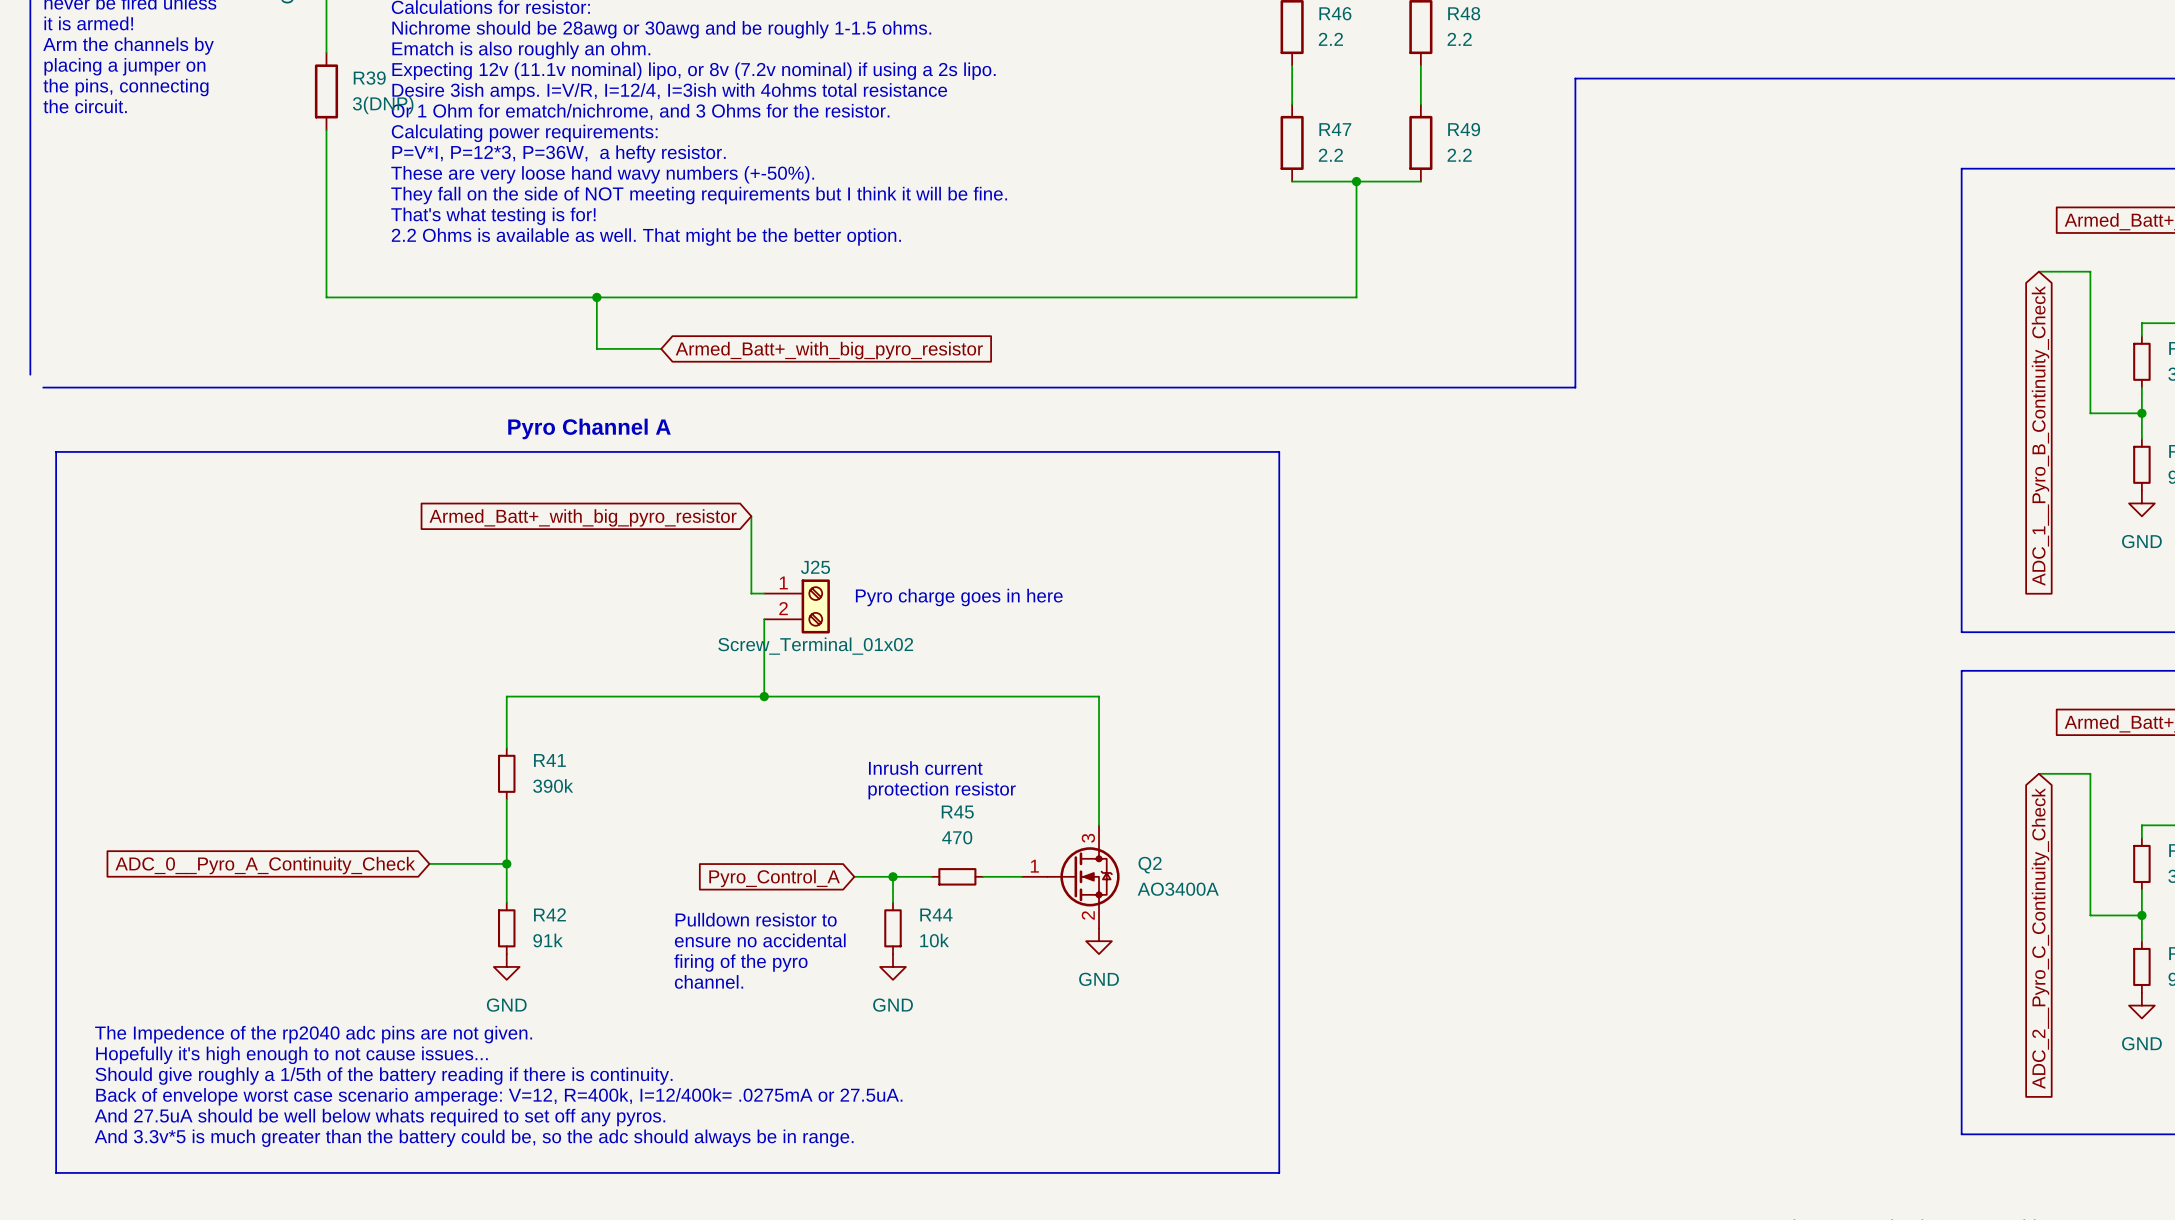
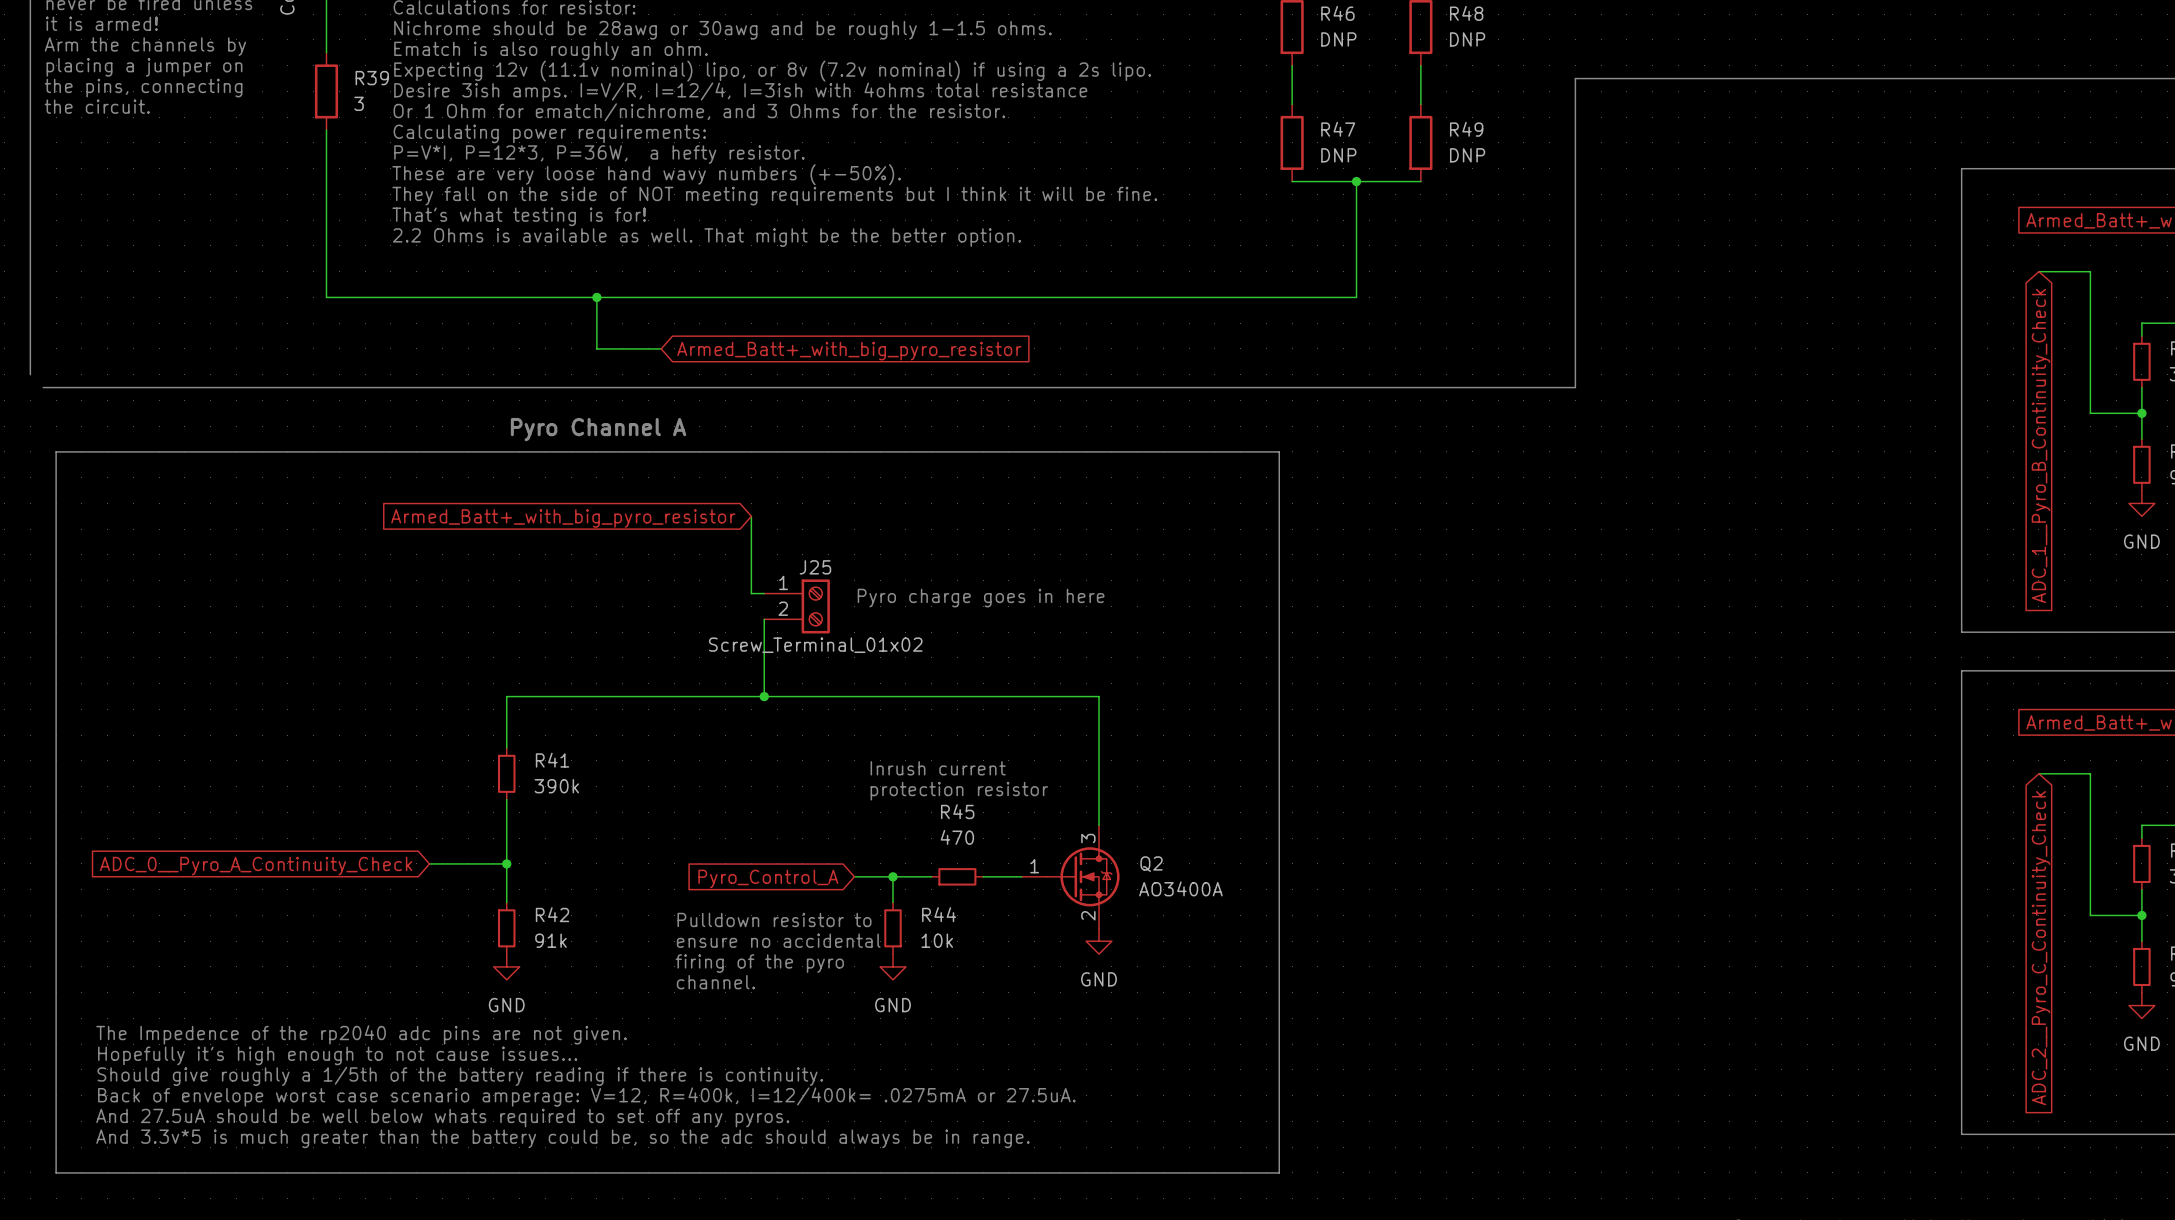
R46 value: 2.2 (1330, 39) -> DNP (1338, 39)
R48 value: 2.2 (1459, 39) -> DNP (1467, 39)
R39 value: 3(DNP) (383, 105) -> 3 (359, 103)
R47 value: 2.2 (1330, 155) -> DNP (1338, 155)
R49 value: 2.2 (1459, 155) -> DNP (1467, 155)

